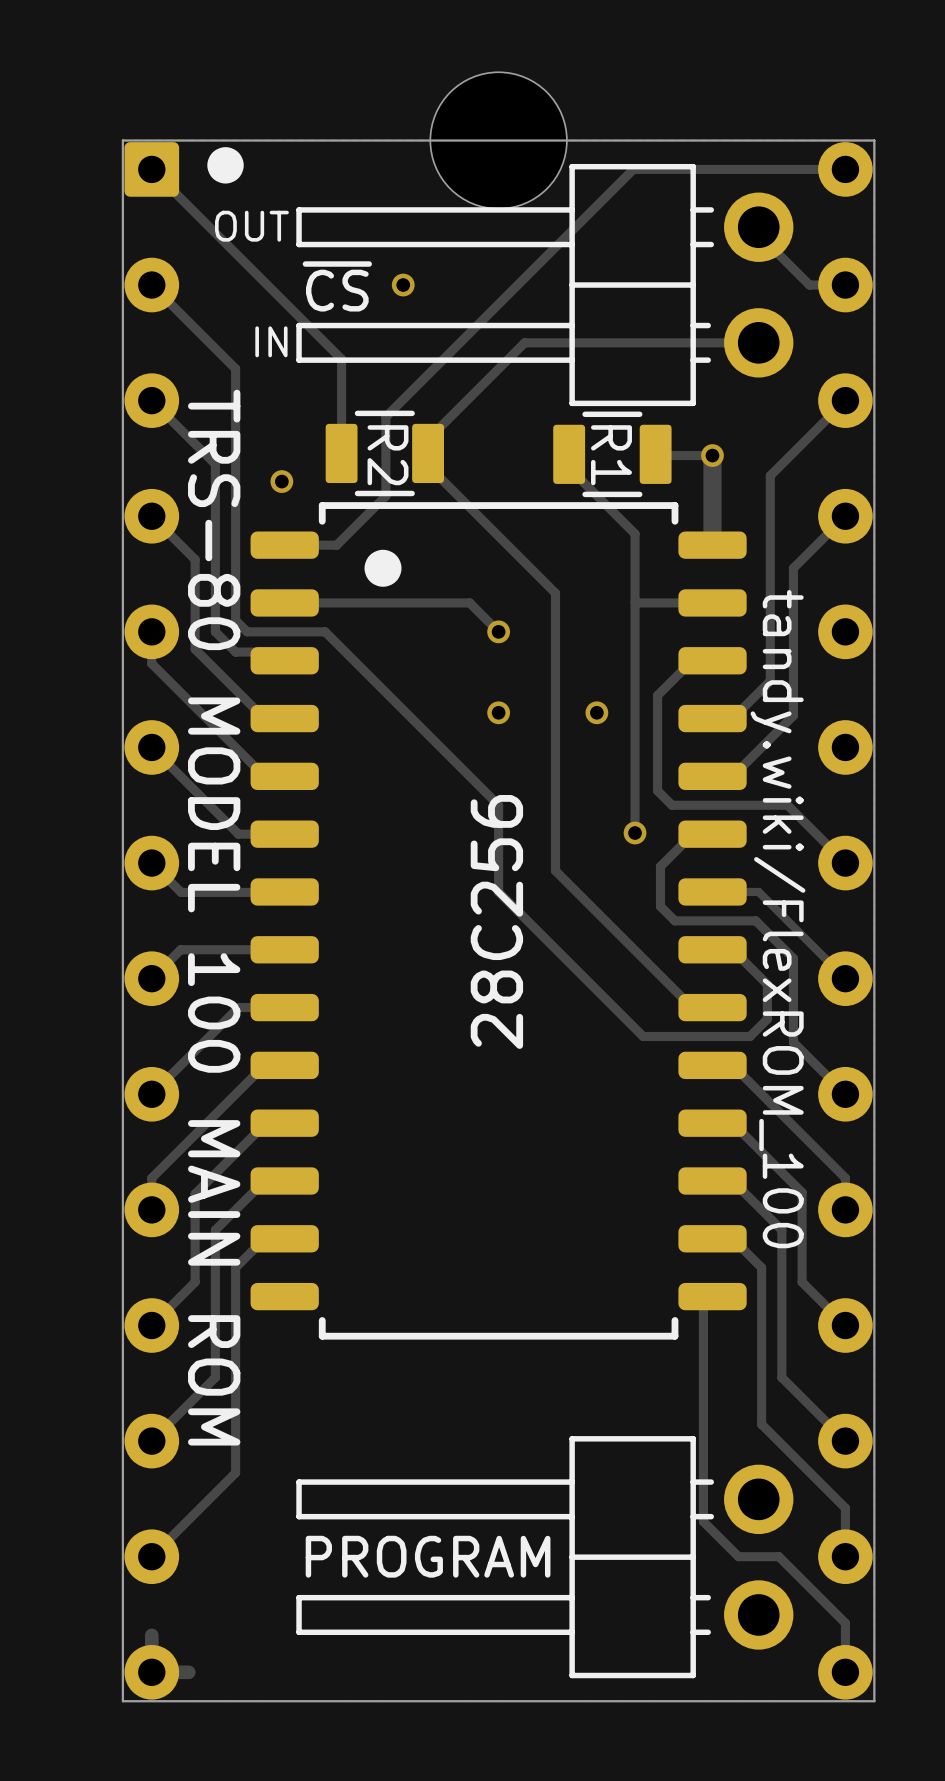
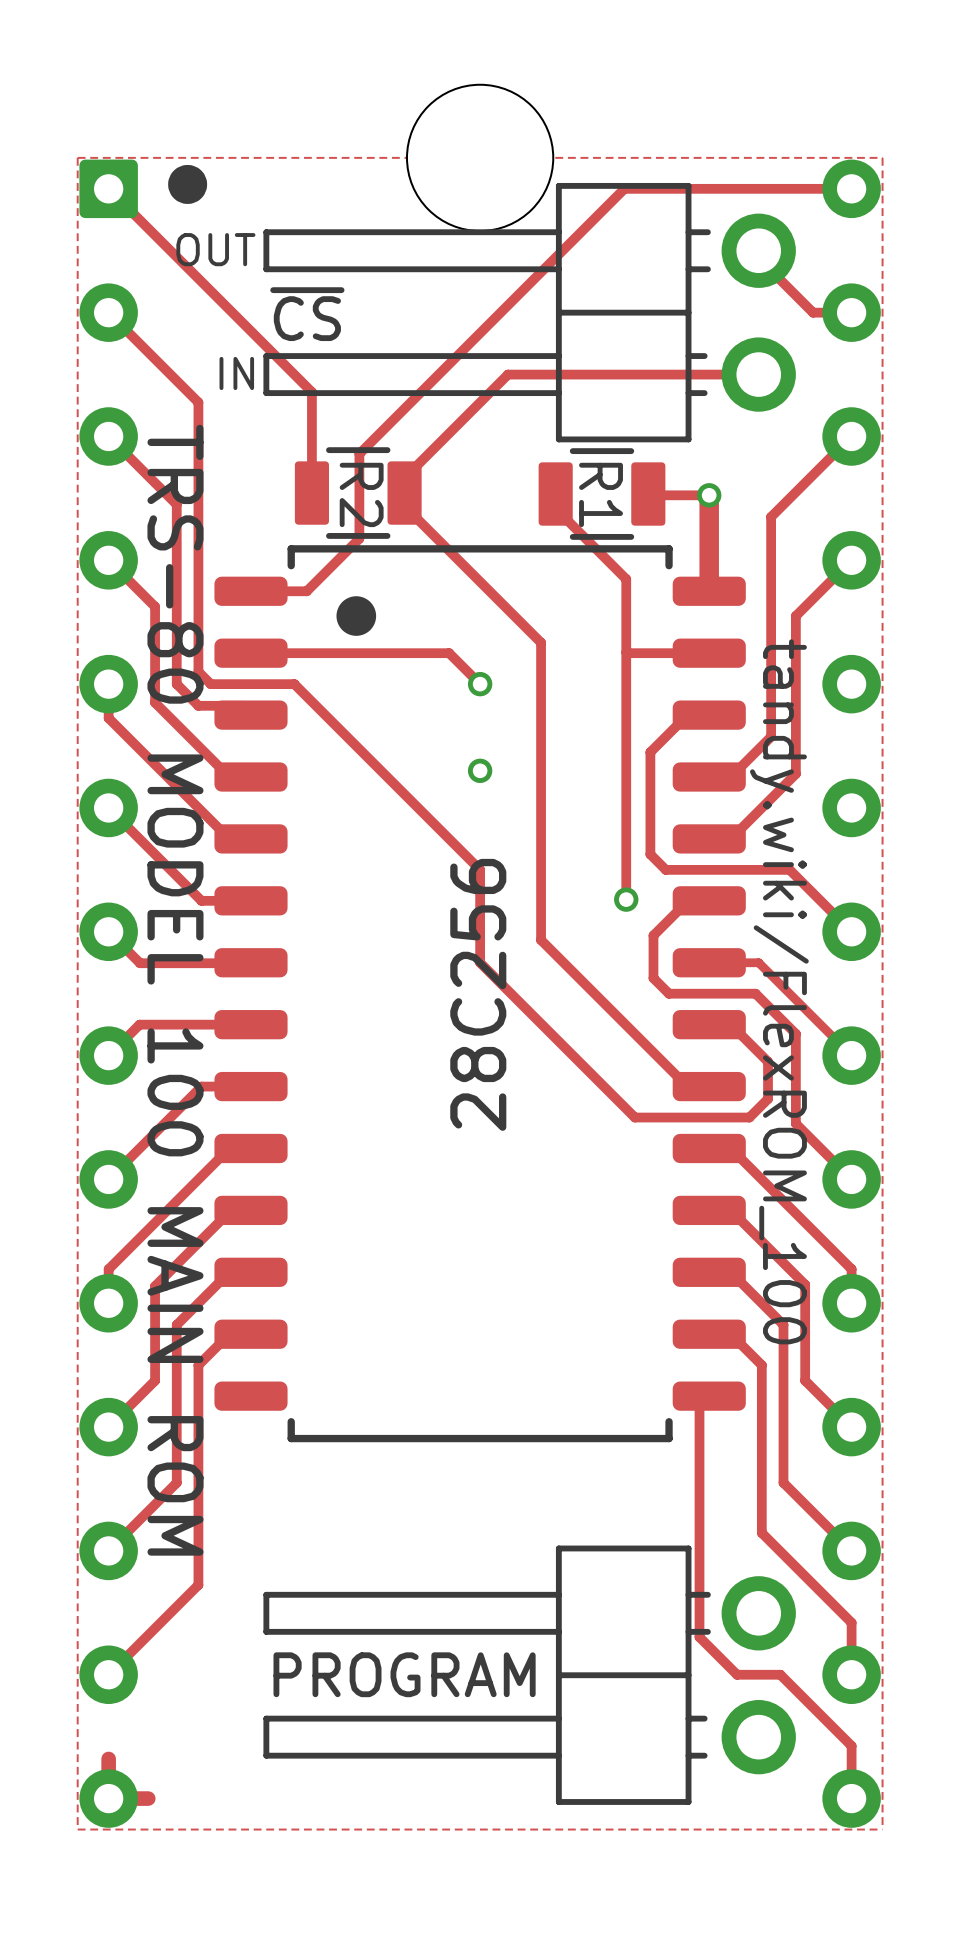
board edge: (122, 140) (122, 1701) (874, 1701) (874, 140) (122, 140) -> none
via: (403, 285) -> none
via: (281, 481) -> none
via: (596, 712) -> none

